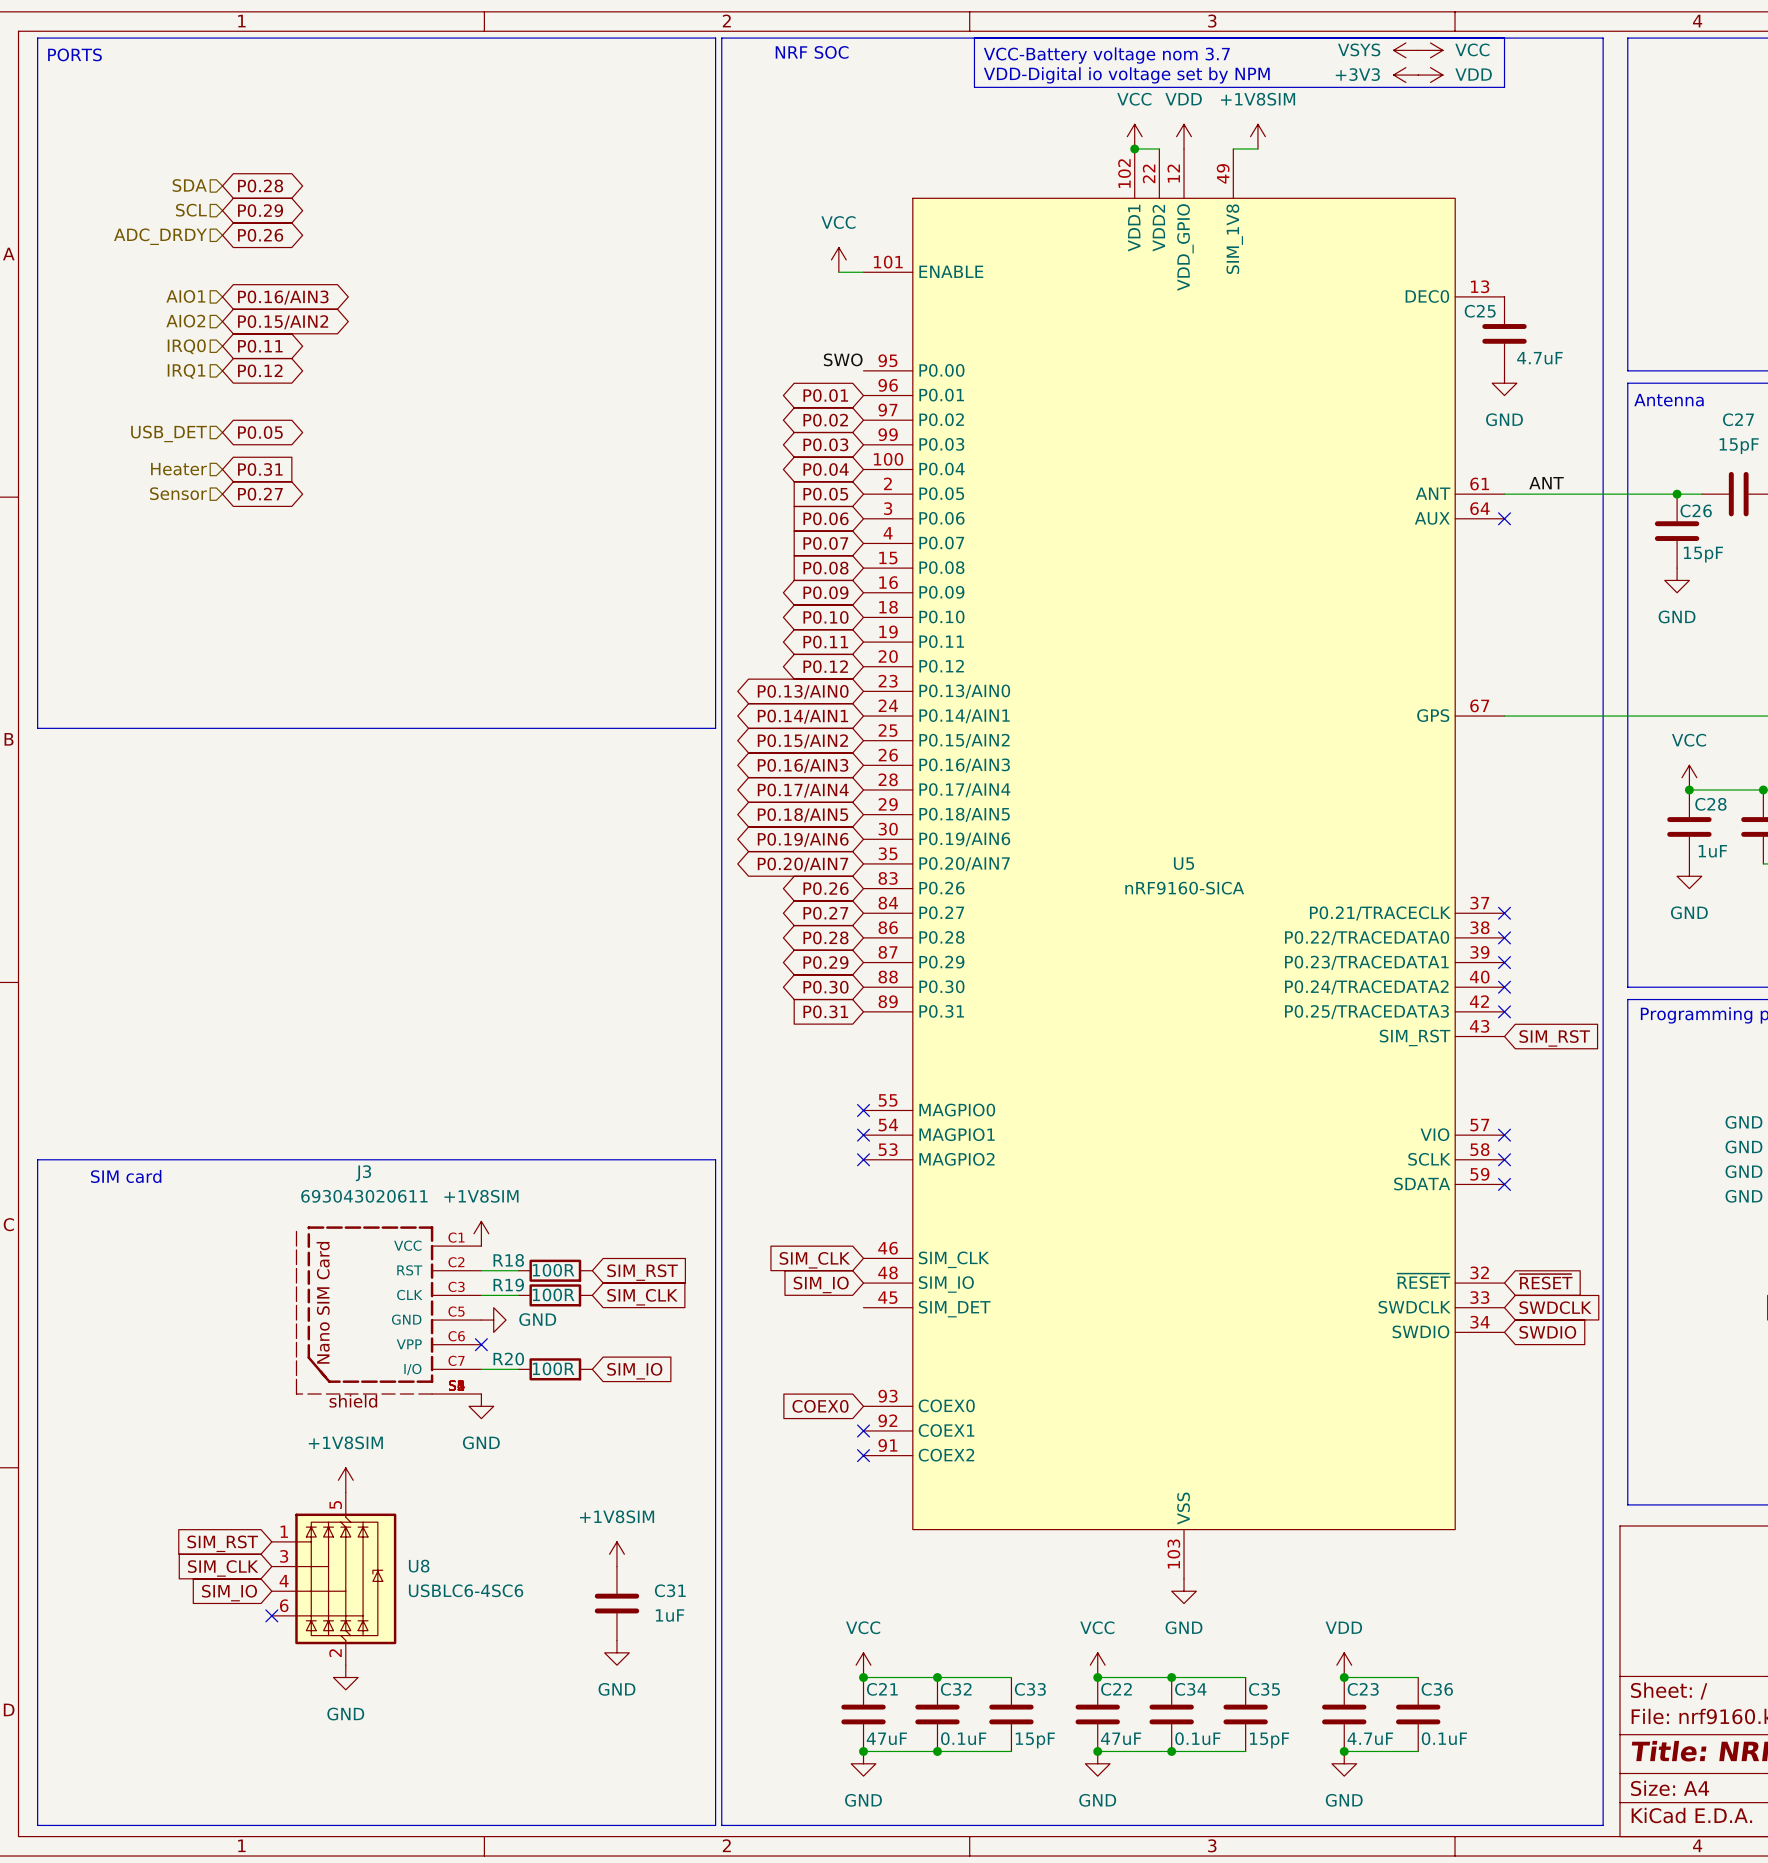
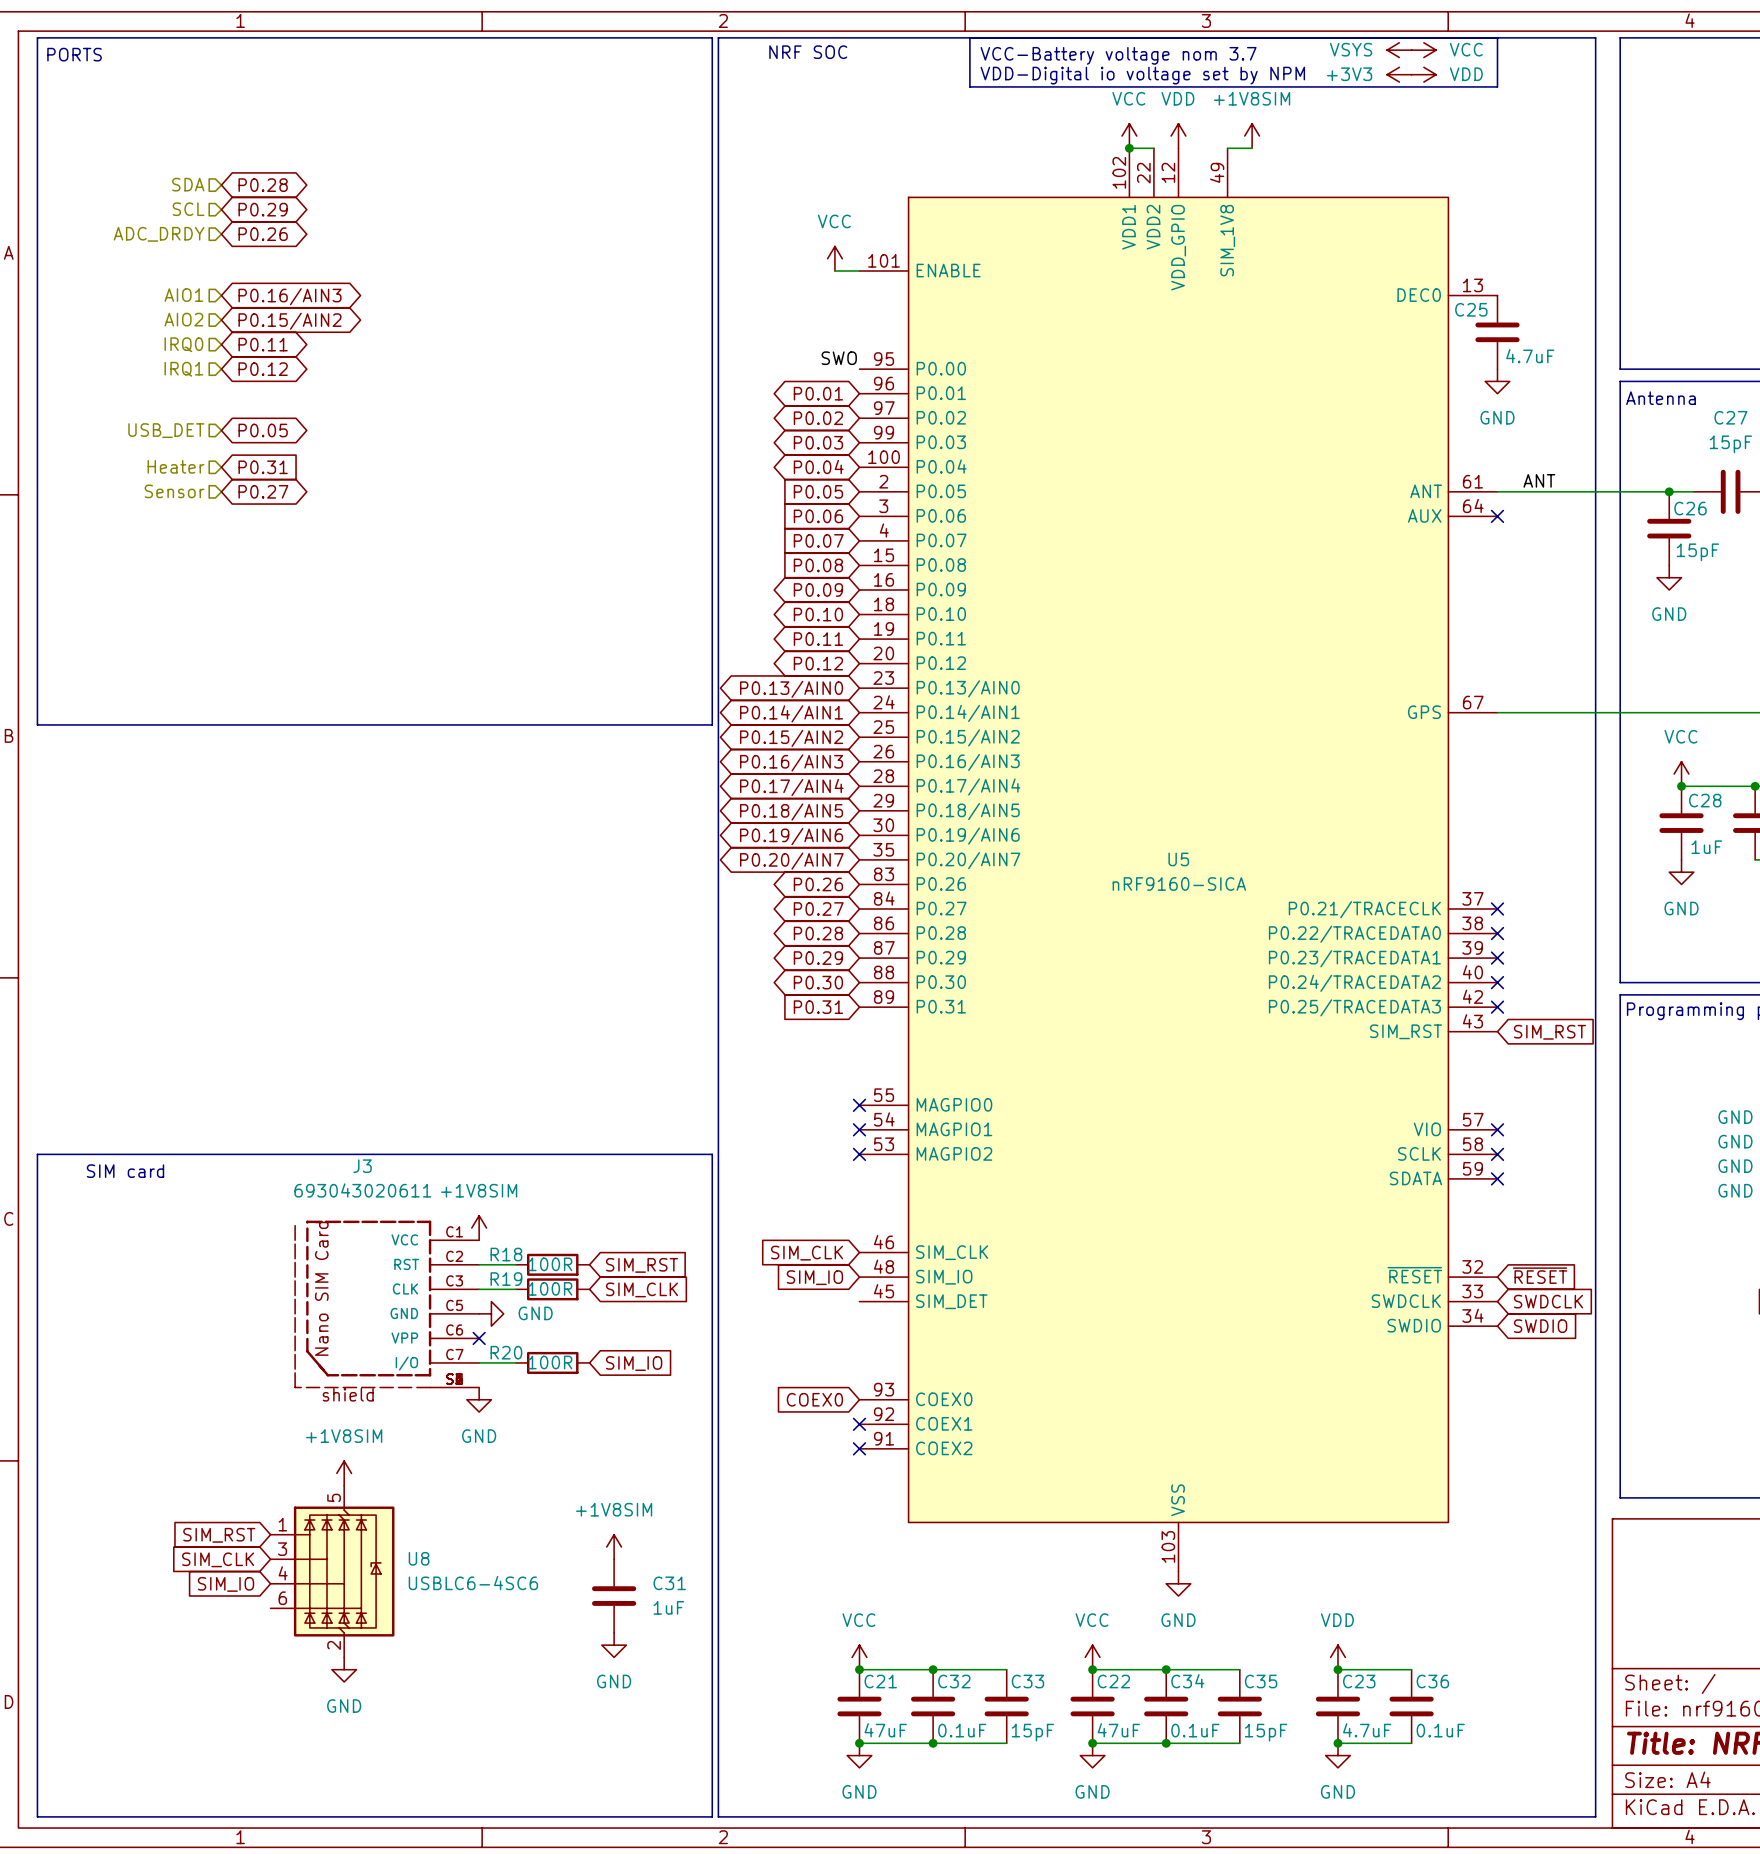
no-connect mark: (271, 1615) -> none

